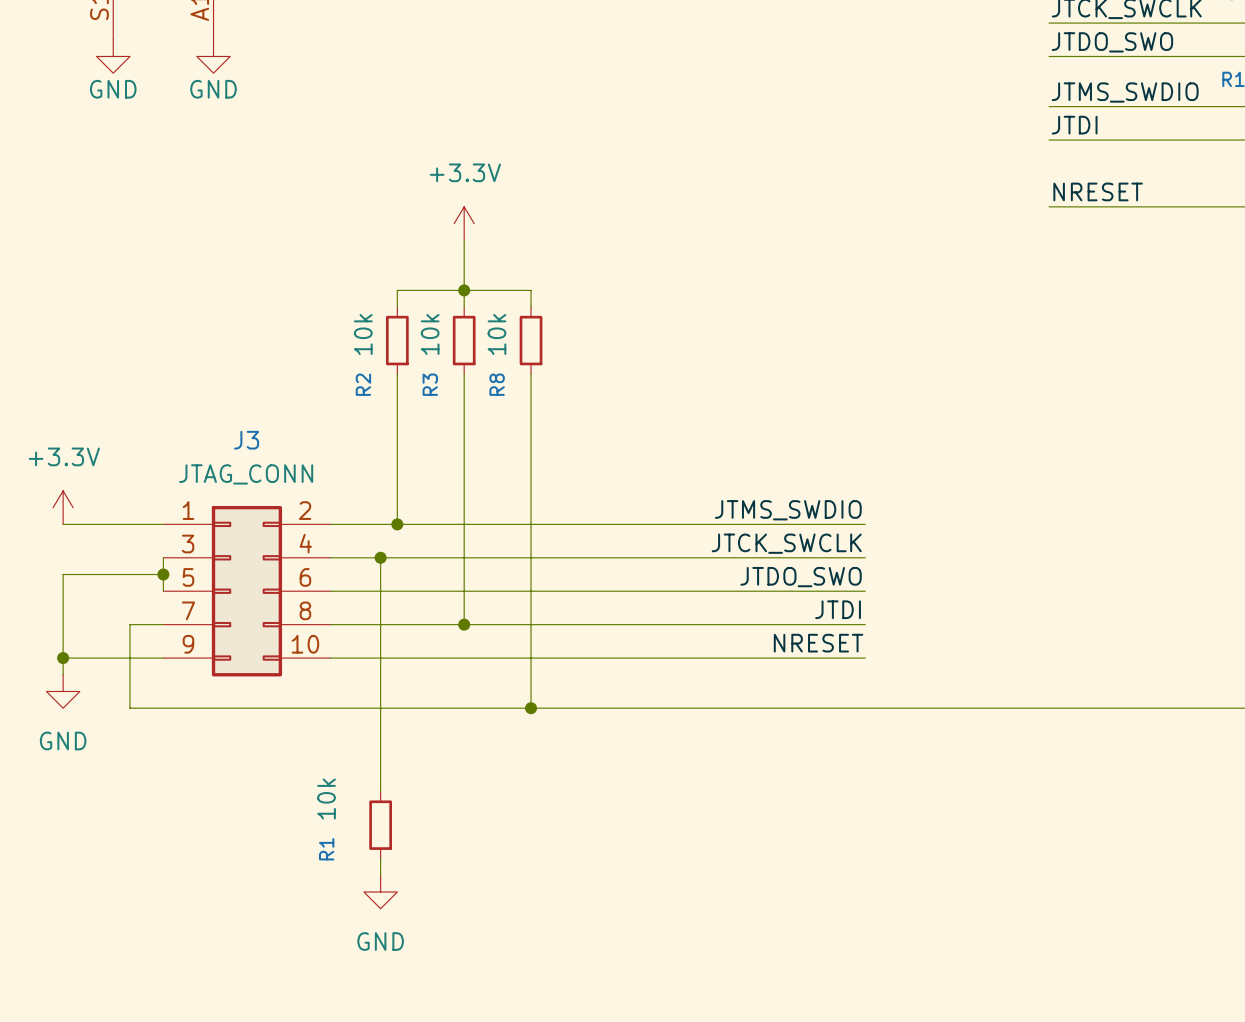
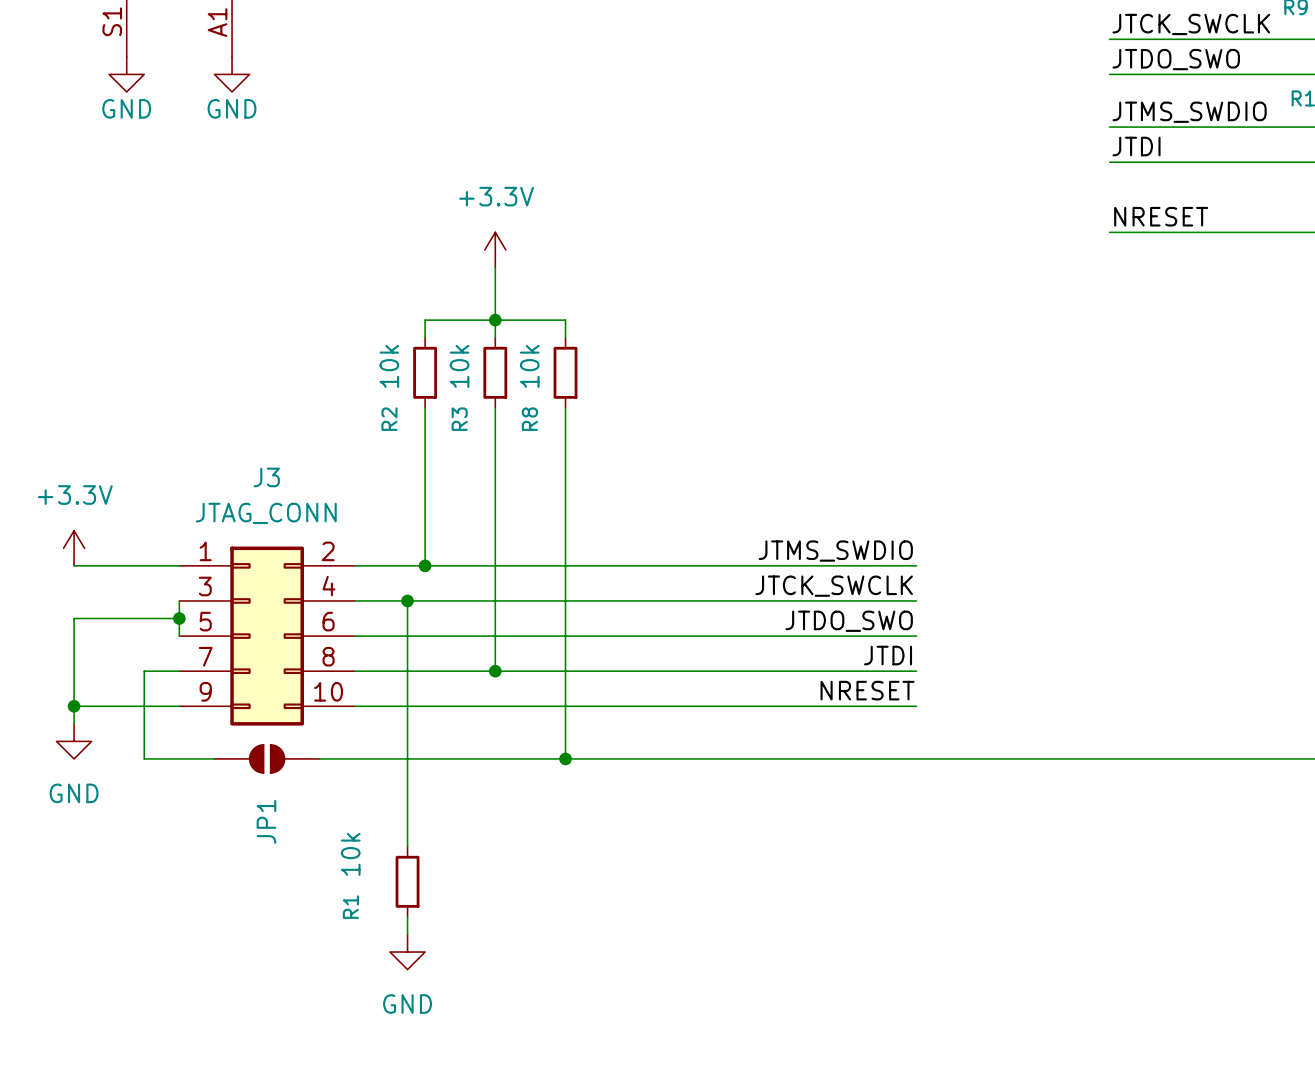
JP1: none -> (267, 758)

